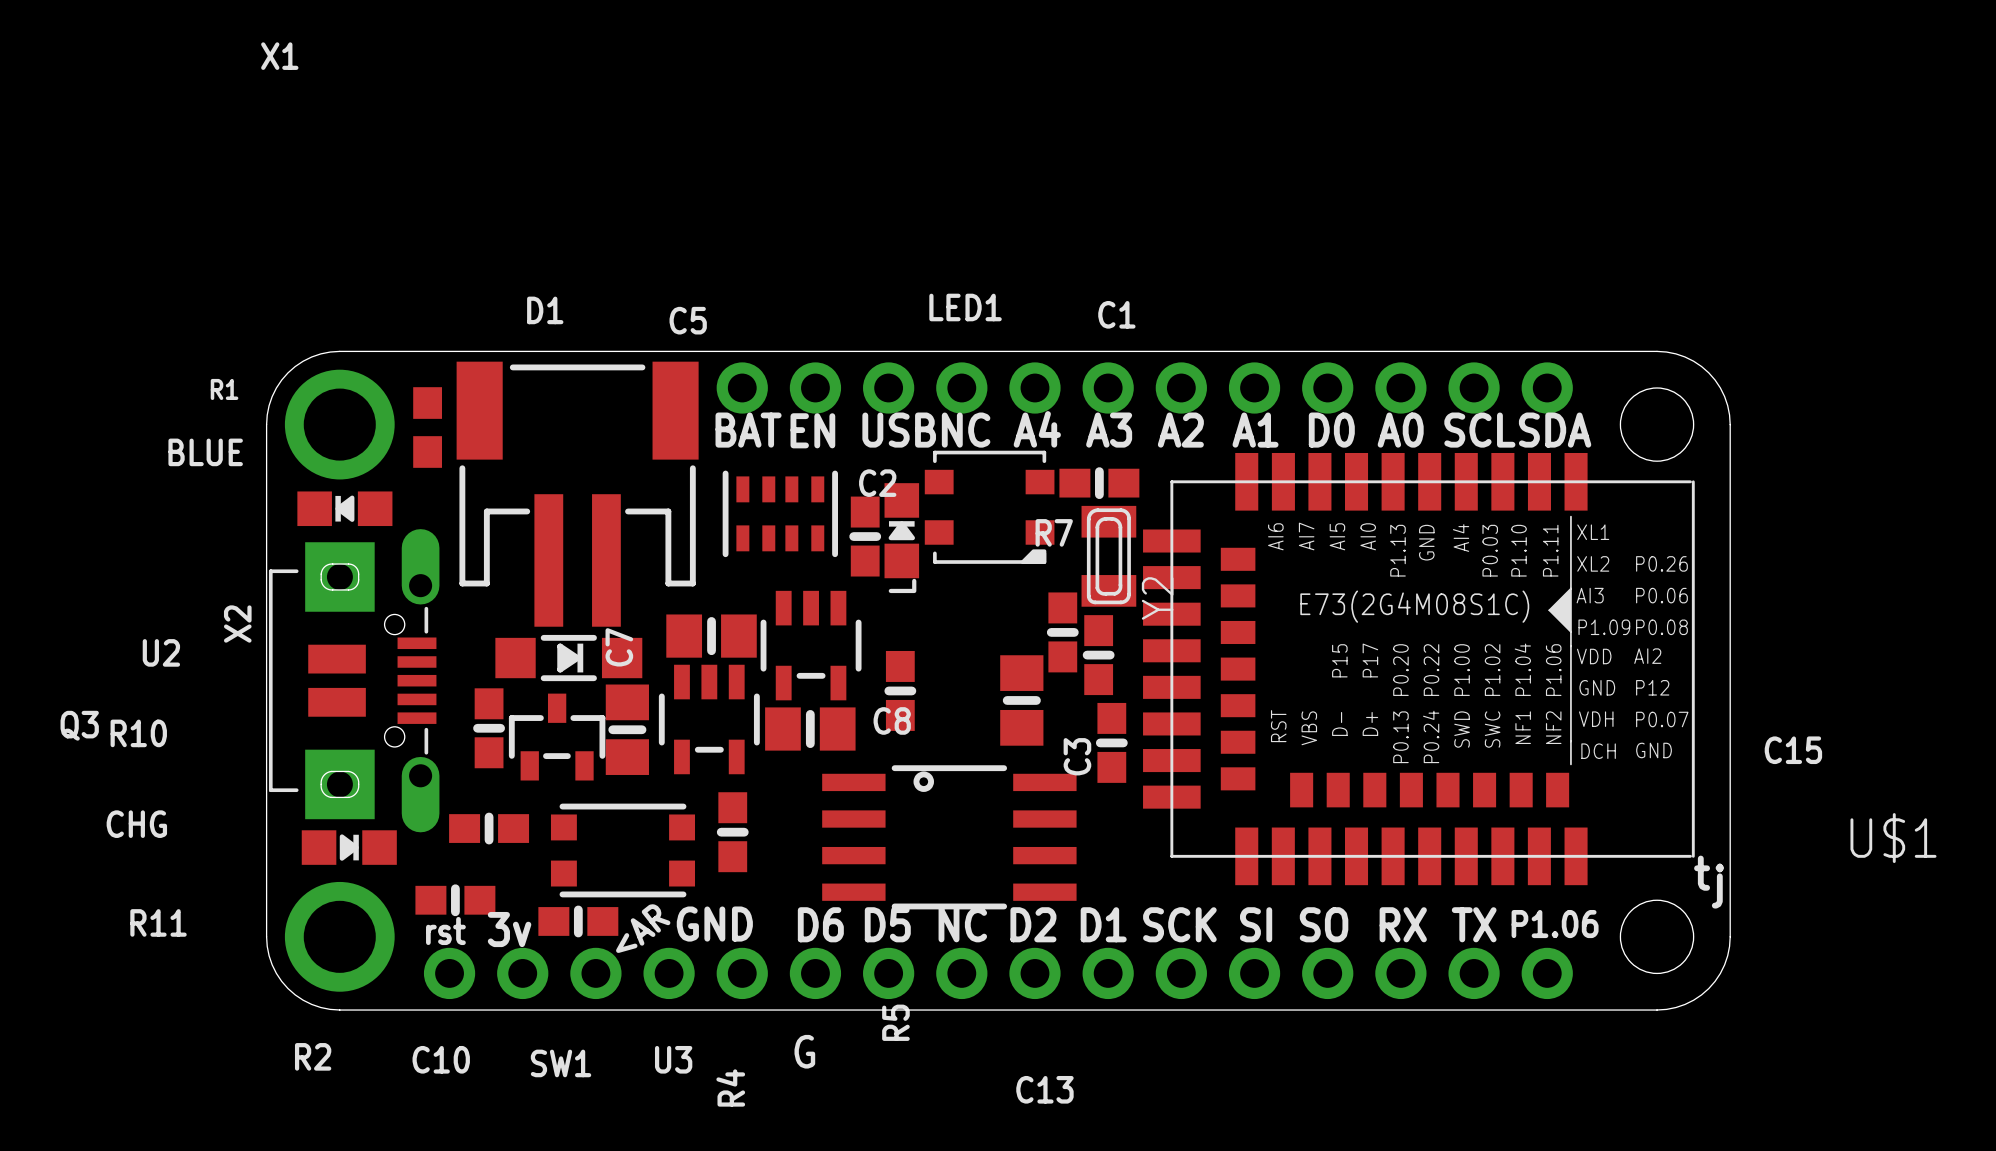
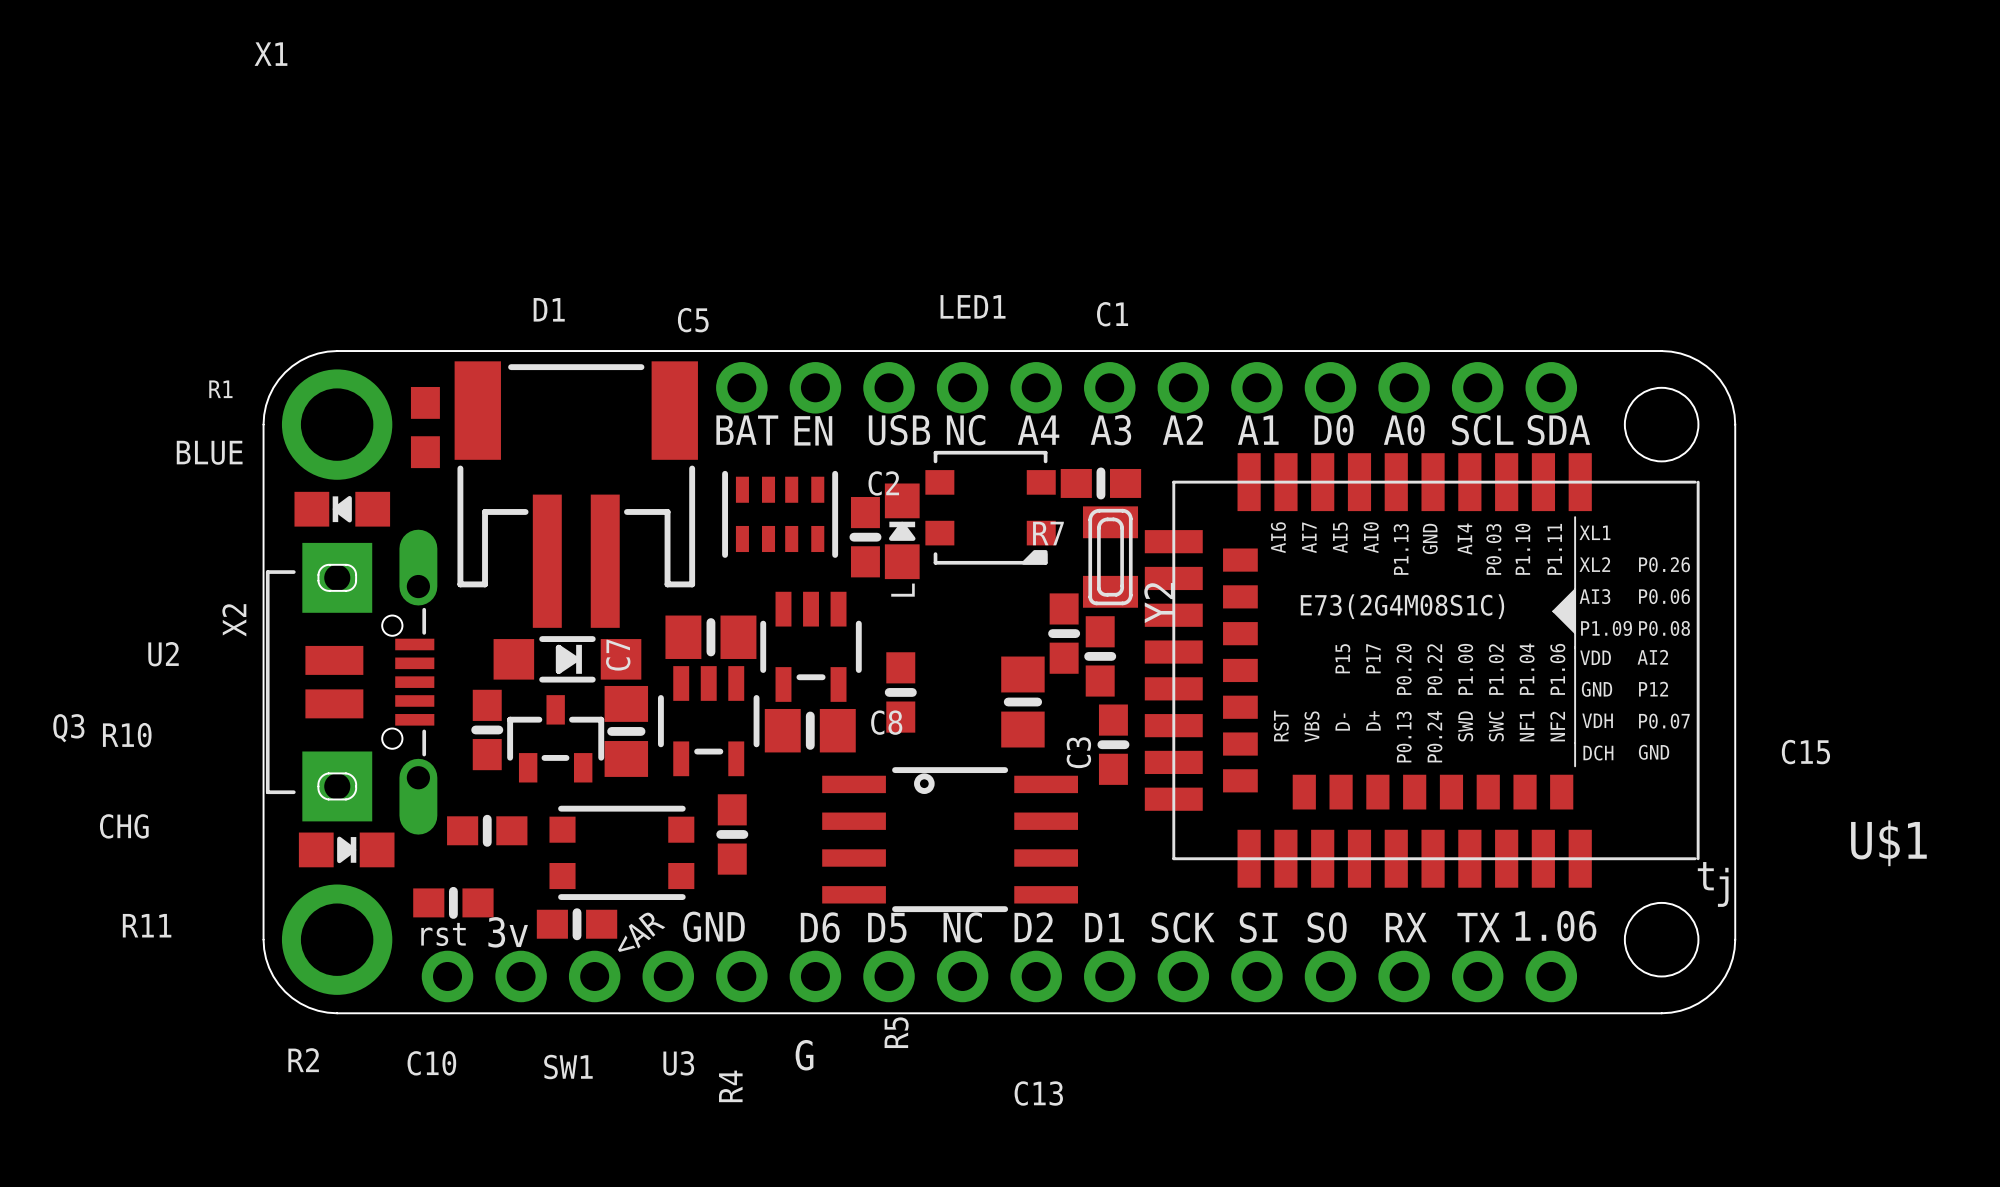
text: P1.06 (1555, 924) -> 1.06 (1555, 926)

